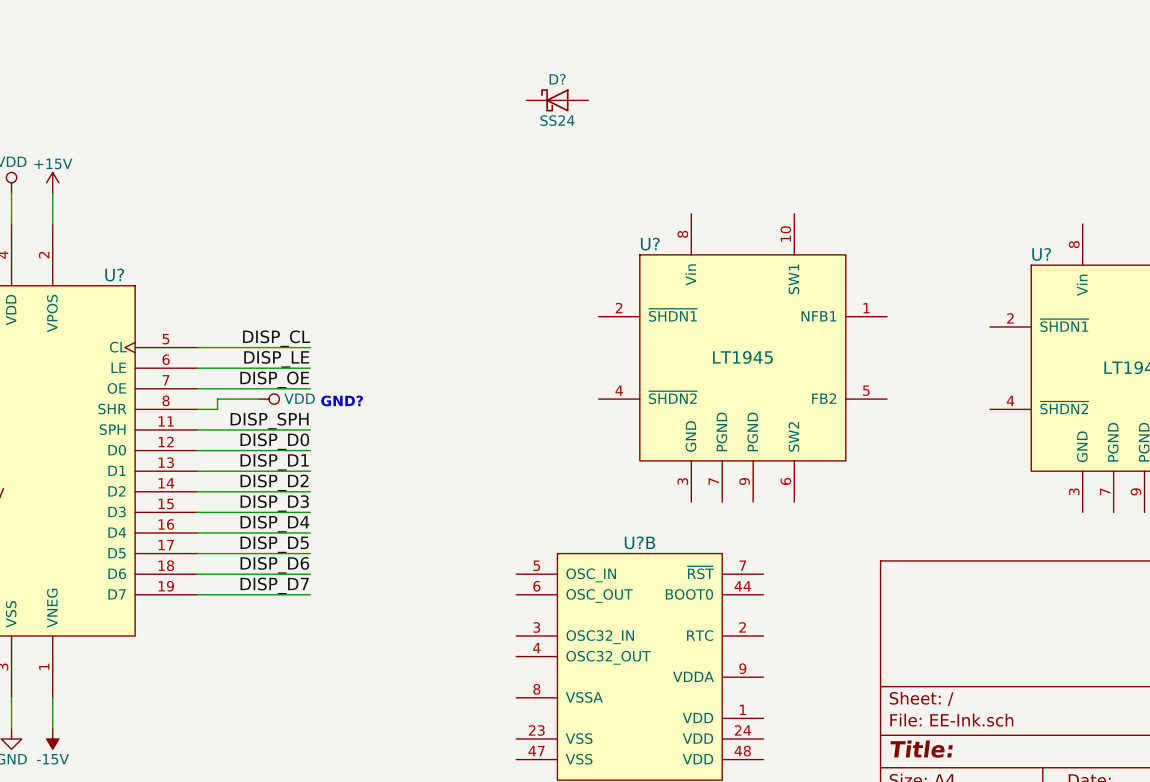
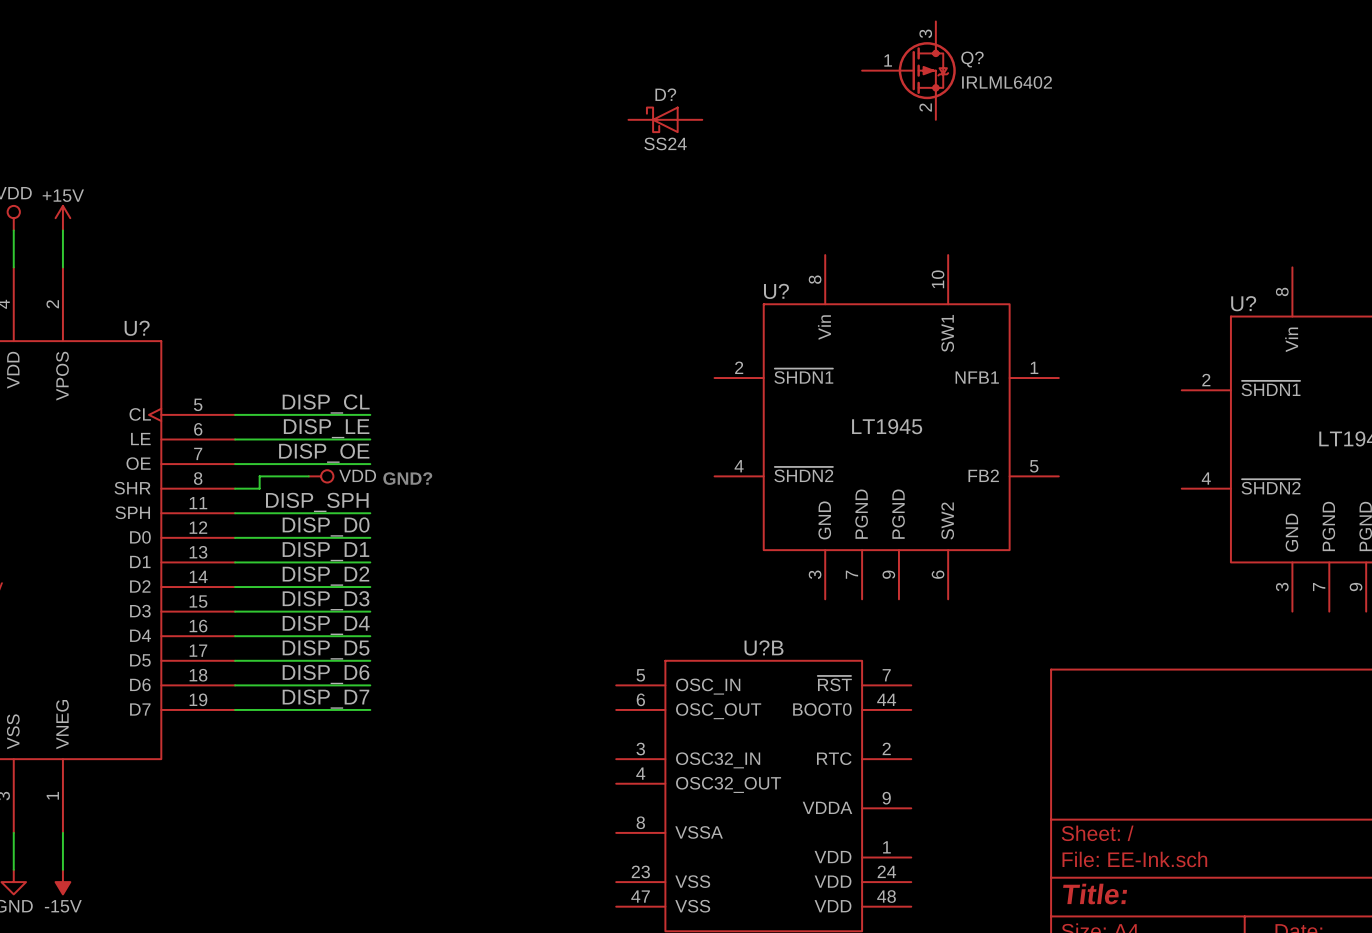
Q?: none -> IRLML6402 (908, 70)

